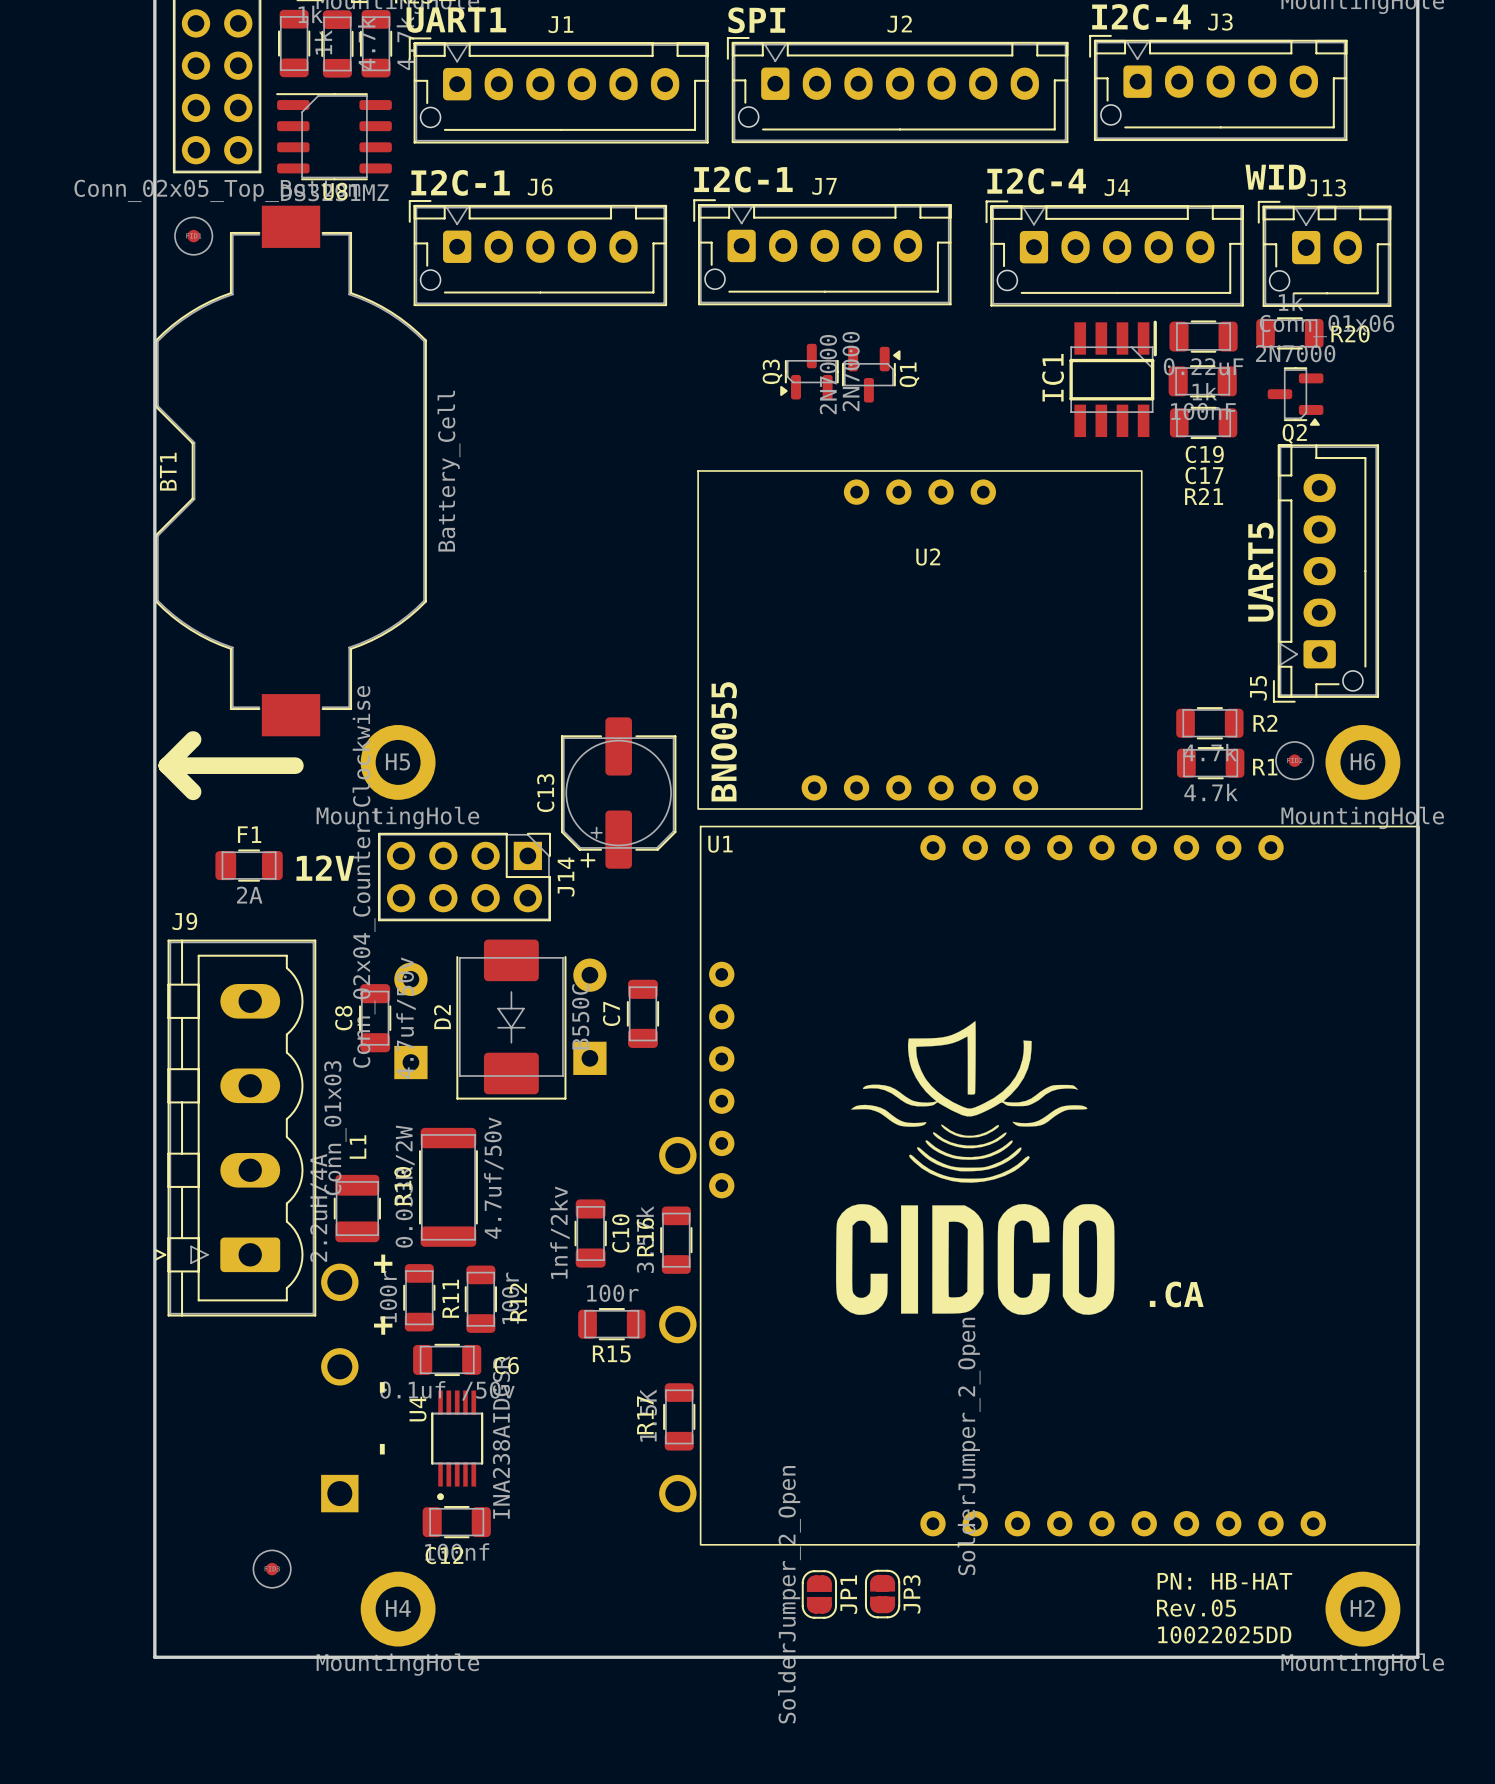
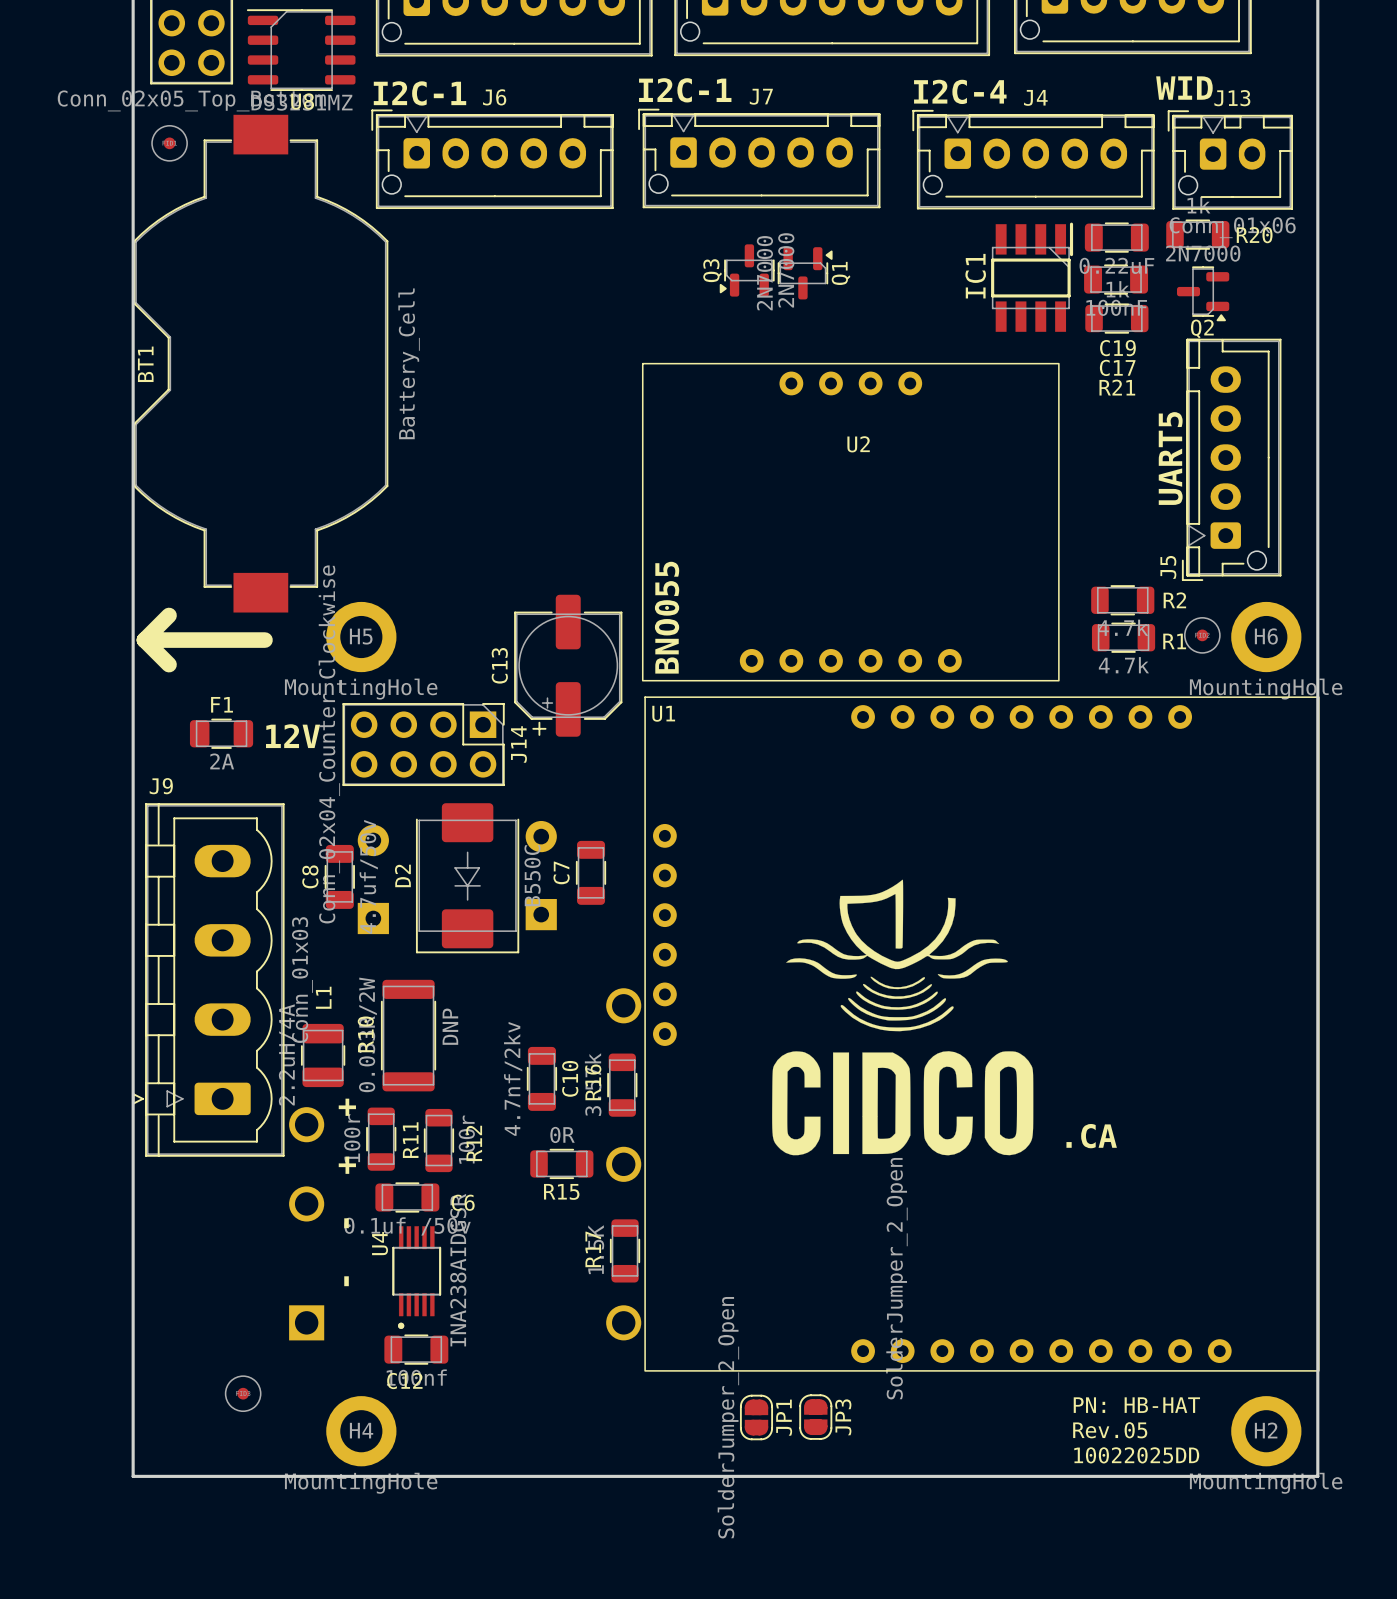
C7 value: 4.7uf/50v (493, 1178) -> DNP (450, 1026)
C10 value: 1nf/2kv (559, 1232) -> 4.7nf/2kv (513, 1078)
R15 value: 100r (612, 1293) -> 0R (562, 1134)

